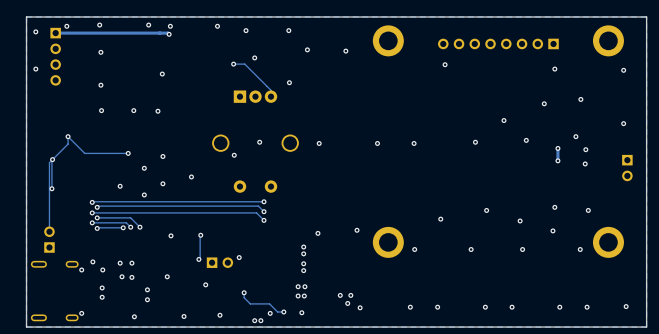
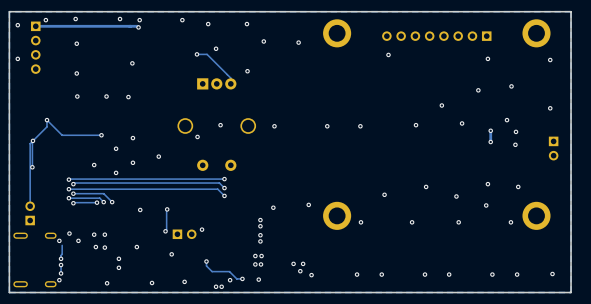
track: none -> (62, 245) (61, 258)
via: (102, 287) -> none
via: none -> (61, 258)
track: none -> (61, 265) (61, 273)
via: none -> (61, 265)
via: (102, 297) -> none
via: none -> (61, 273)

